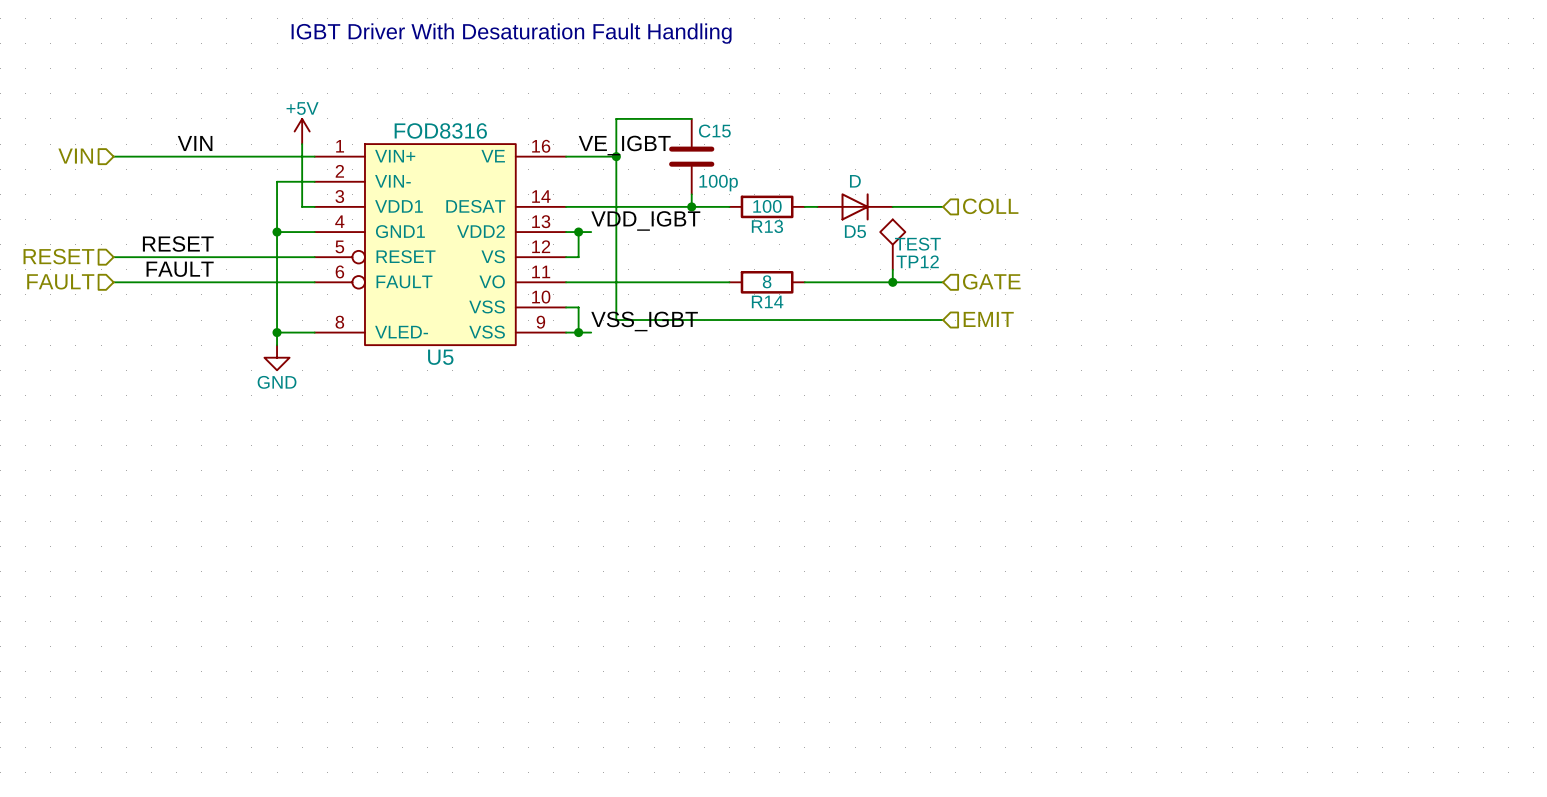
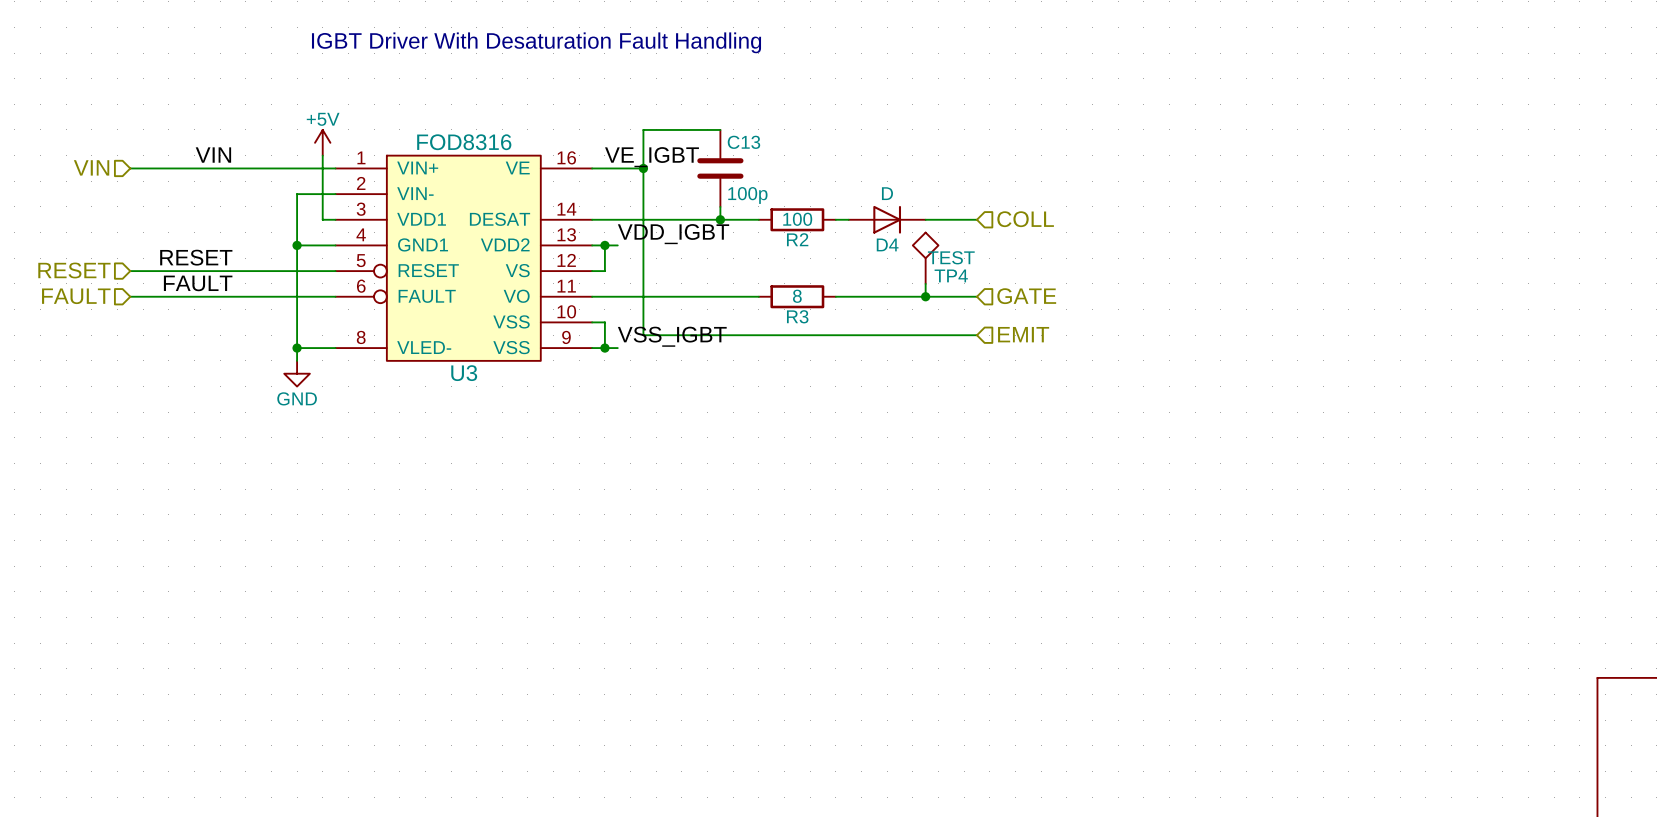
C15 name: C15 (714, 131) -> C13 (743, 142)
R13 name: R13 (767, 226) -> R2 (797, 239)
D5 name: D5 (855, 231) -> D4 (887, 244)
TP12 name: TP12 (917, 261) -> TP4 (951, 275)
R14 name: R14 (767, 301) -> R3 (797, 316)
U5 name: U5 (440, 357) -> U3 (464, 373)

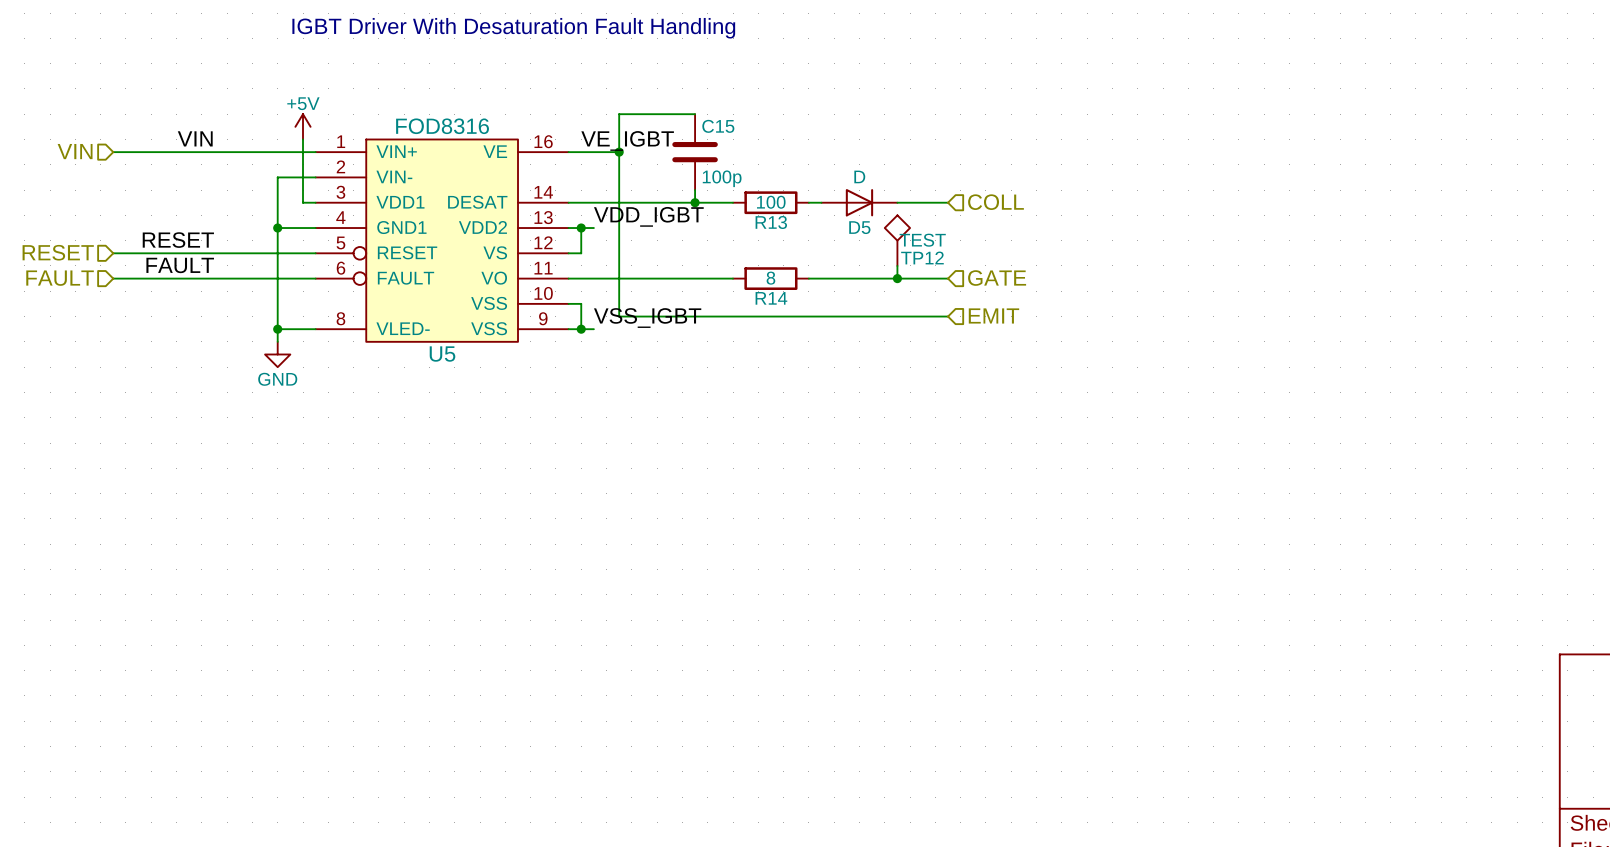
C13 name: C13 (743, 142) -> C15 (718, 126)
R2 name: R2 (797, 239) -> R13 (771, 222)
D4 name: D4 (887, 244) -> D5 (859, 227)
TP4 name: TP4 (951, 275) -> TP12 (922, 257)
R3 name: R3 (797, 316) -> R14 (771, 298)
U3 name: U3 (464, 373) -> U5 (442, 354)

